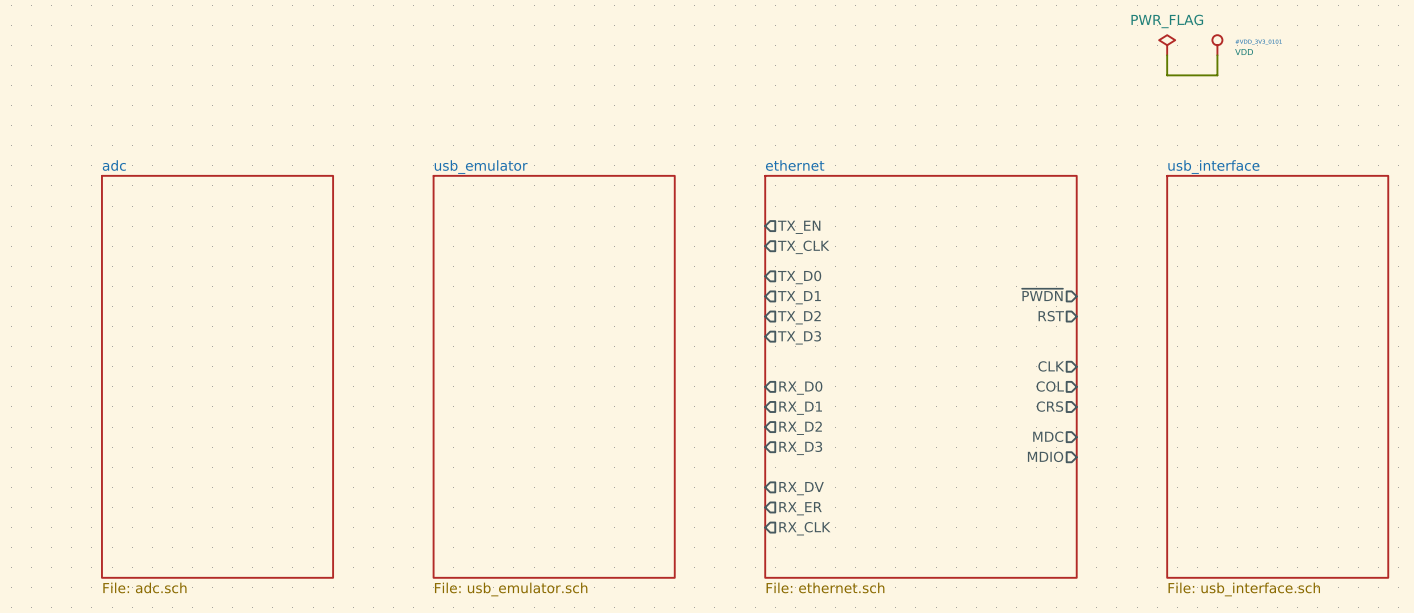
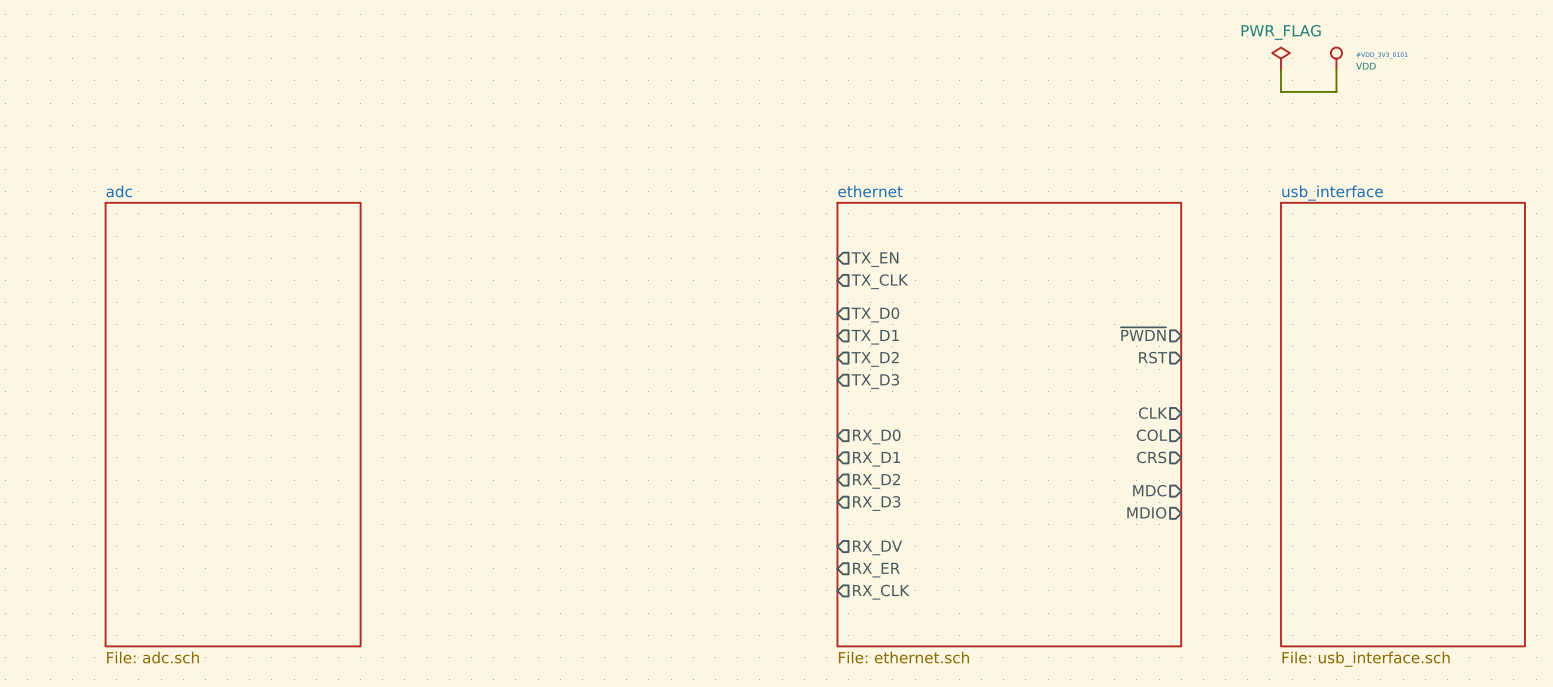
sheet usb_emulator: File: usb_emulator.sch (554, 376) -> none

